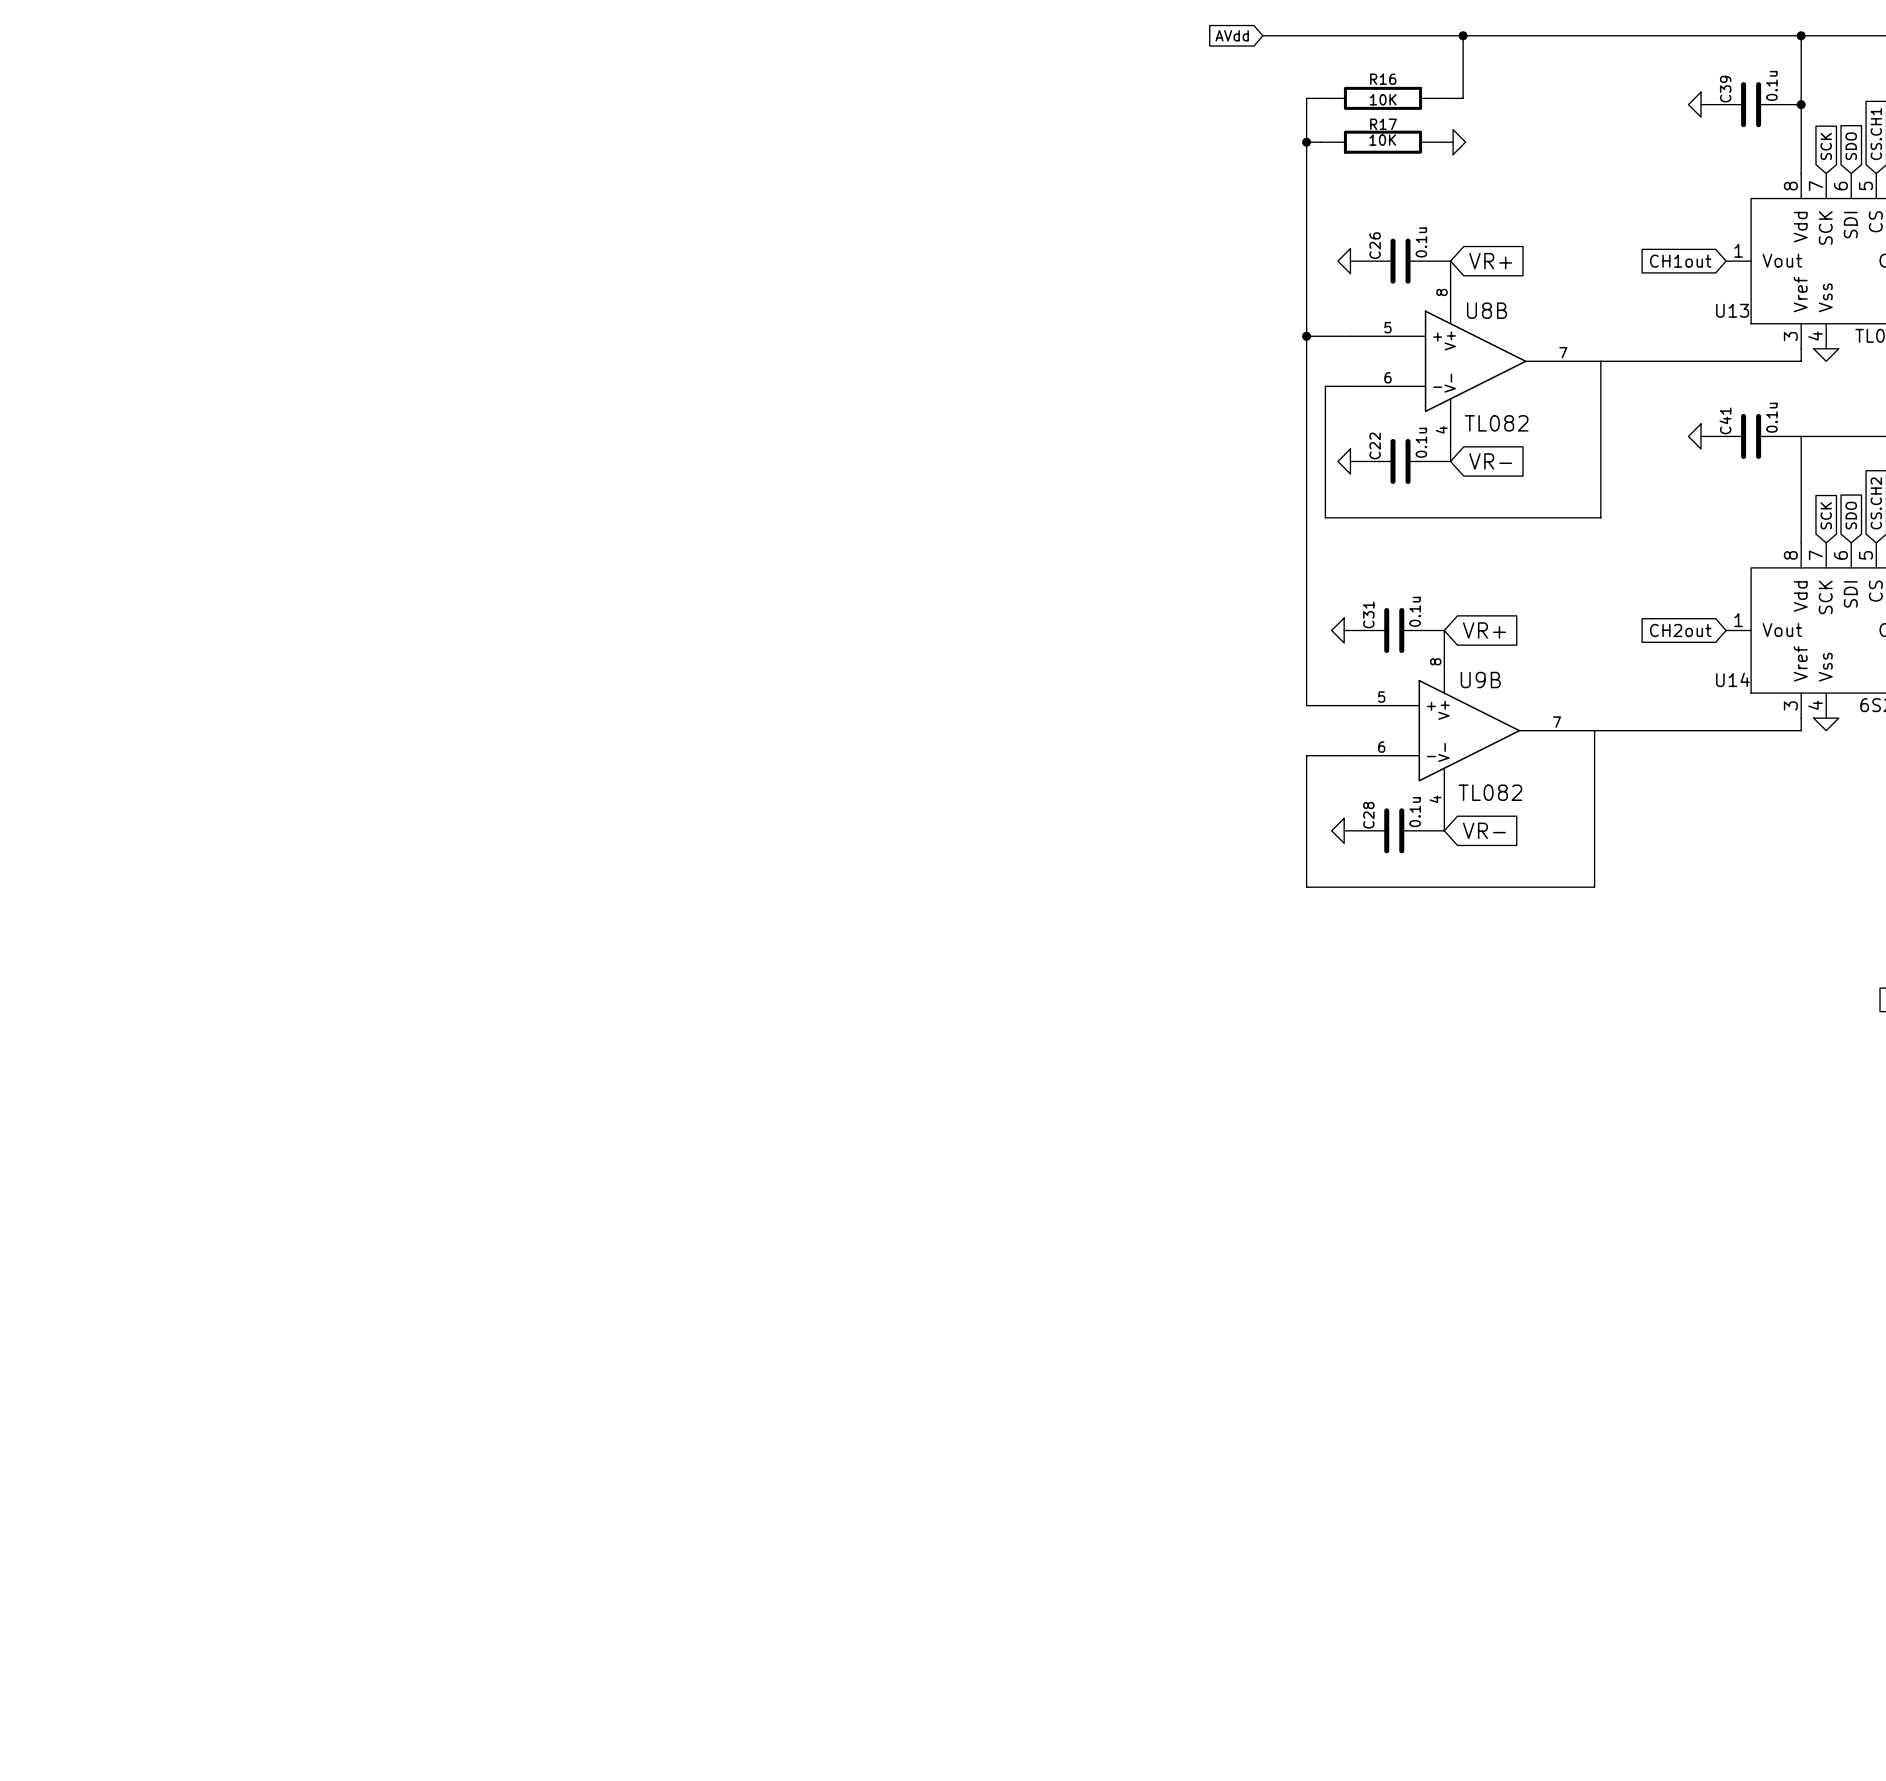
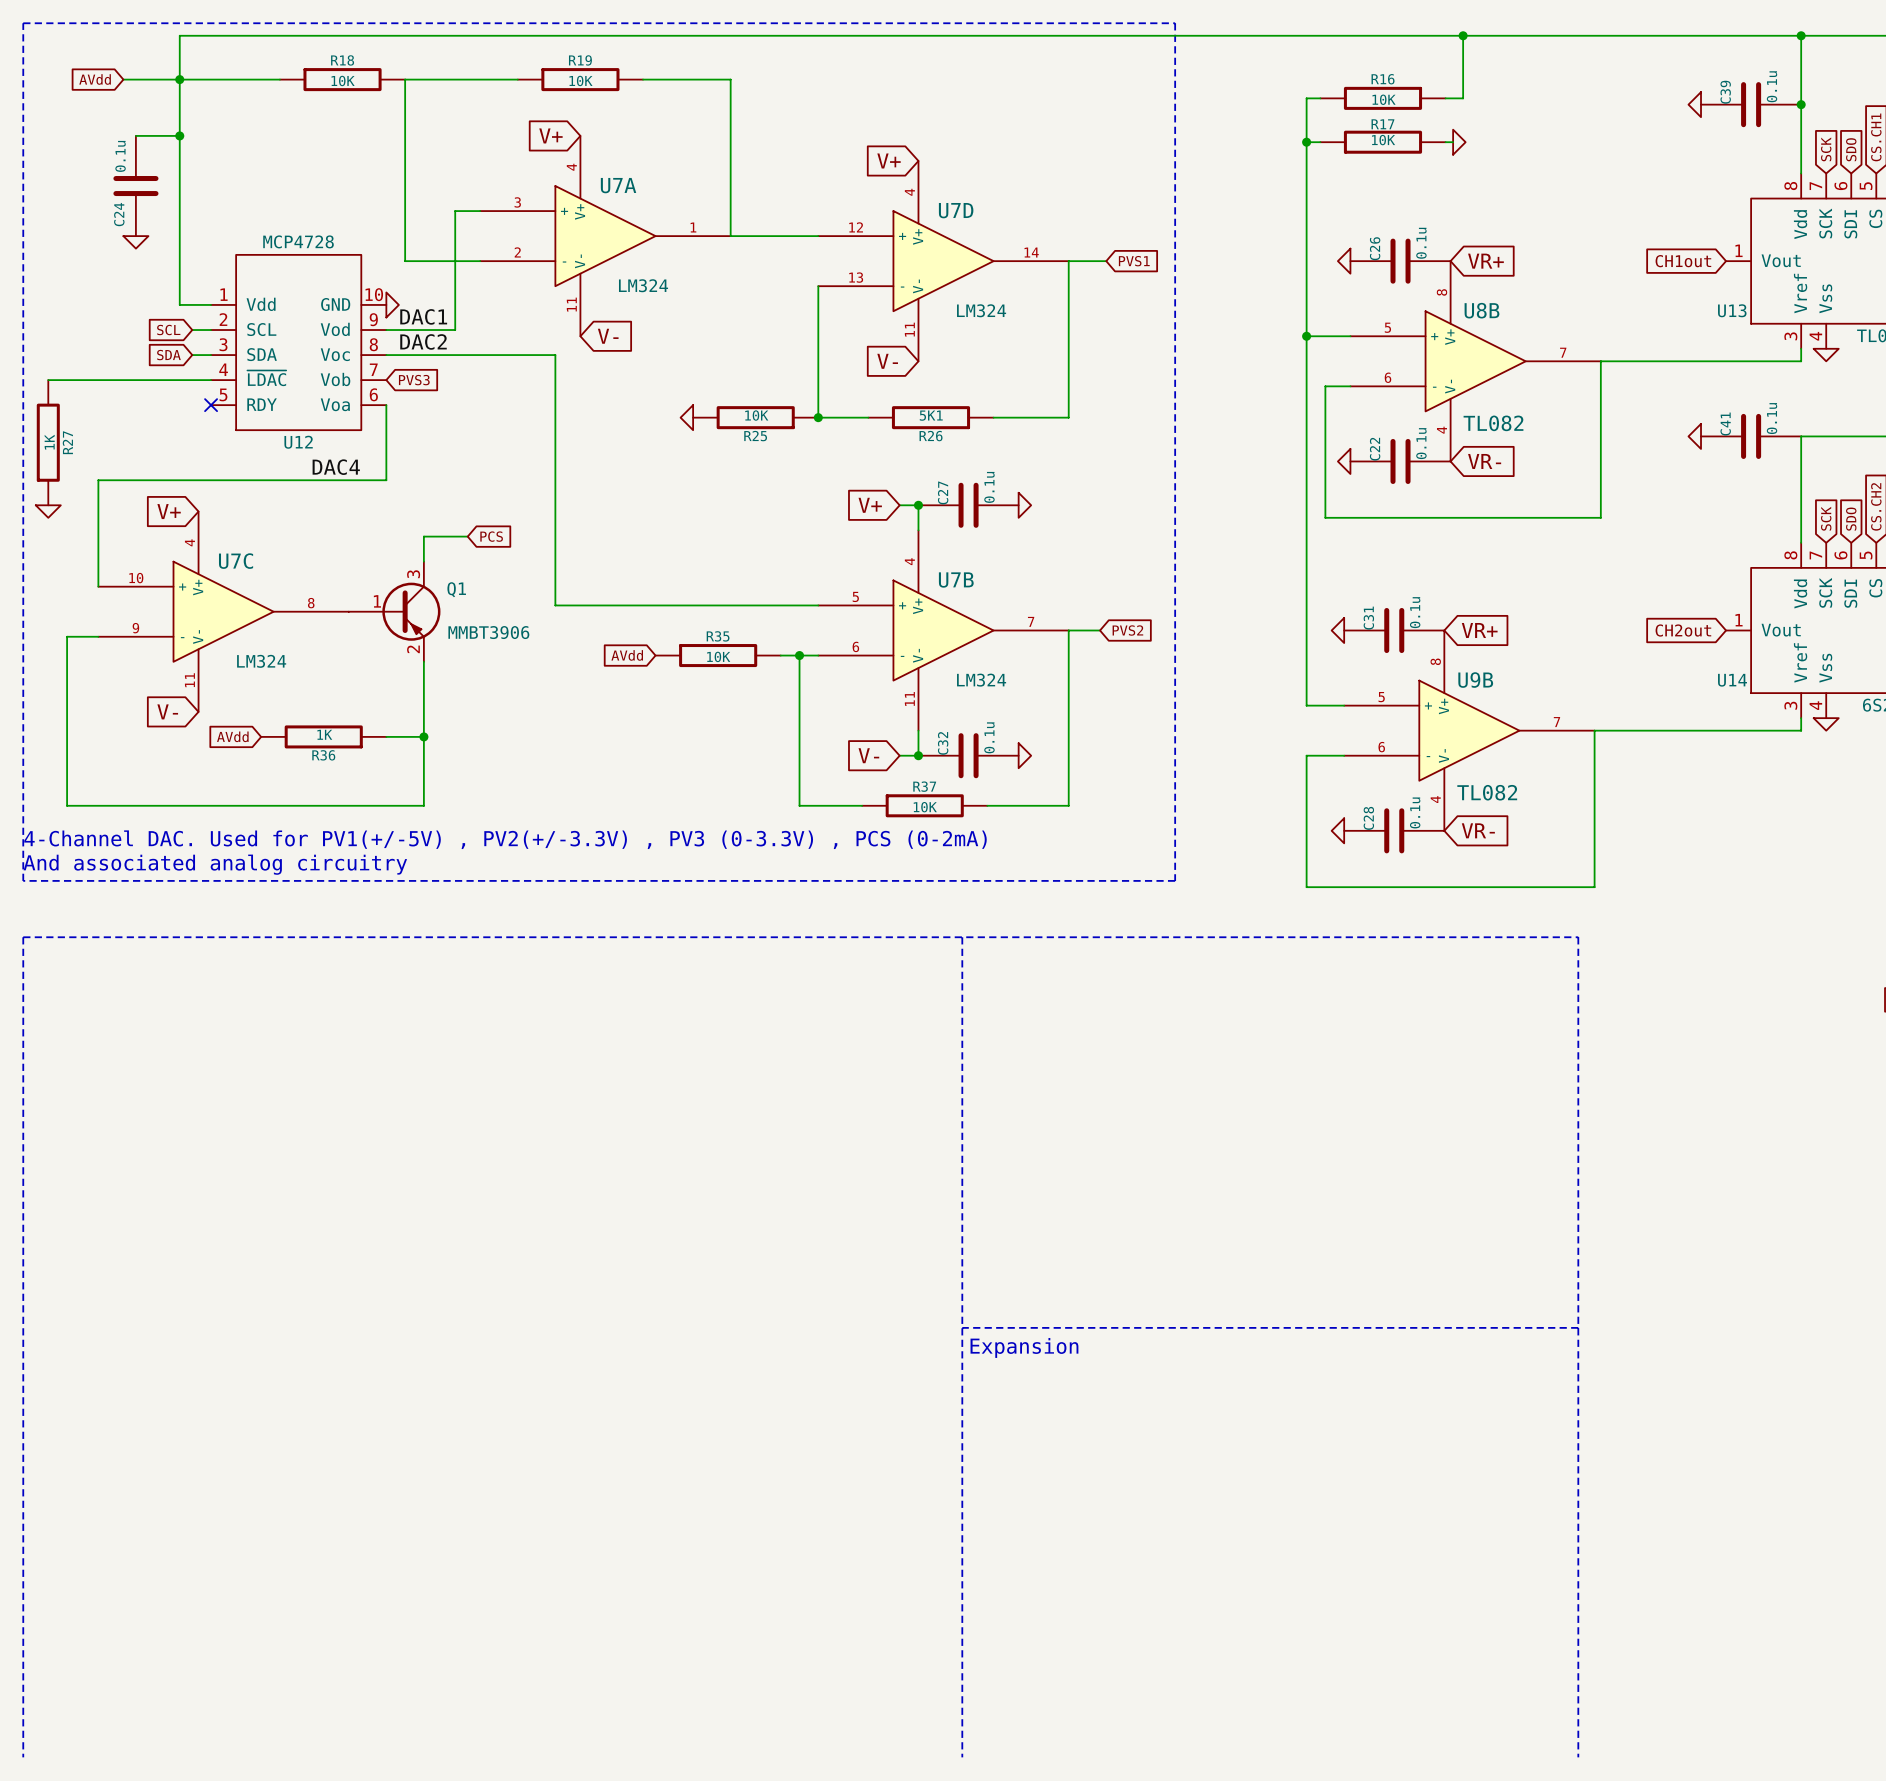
line: none -> (23, 23) (23, 880) (1175, 880) (1175, 23) (23, 23)
global label: AVdd (1232, 35) -> none
wire: none -> (1262, 35) (179, 35) (179, 304) (211, 304)
global label: none -> AVdd (95, 79)
wire: none -> (123, 79) (279, 79)
junction: none -> (179, 79)
R18: none -> 10K (342, 79)
wire: none -> (517, 79) (405, 79) (405, 261) (480, 261)
R19: none -> 10K (580, 79)
wire: none -> (643, 79) (730, 79) (730, 236) (818, 236)
wire: none -> (135, 135) (179, 135)
junction: none -> (179, 135)
global label: none -> V+ (550, 135)
global label: none -> V+ (889, 160)
C24: none -> 0.1u (135, 186)
wire: none -> (480, 211) (455, 211) (455, 330) (386, 330)
U7A: none -> LM324 (605, 236)
power symbol: none -> (135, 242)
U7D: none -> LM324 (943, 261)
wire: none -> (1106, 261) (1068, 261) (1068, 417) (993, 417)
global label: none -> PVS1 (1134, 261)
wire: none -> (818, 286) (818, 417) (868, 417)
power symbol: none -> (392, 304)
label: none -> DAC1 (423, 316)
global label: none -> SCL (168, 330)
wire: none -> (192, 330) (211, 330)
global label: none -> V- (608, 336)
label: none -> DAC2 (423, 341)
U12: none -> MCP4728 (298, 342)
global label: none -> SDA (168, 355)
wire: none -> (192, 355) (211, 355)
wire: none -> (386, 355) (555, 355) (555, 605) (818, 605)
global label: none -> V- (887, 361)
wire: none -> (48, 380) (211, 380)
global label: none -> PVS3 (414, 380)
no-connect mark: none -> (211, 405)
wire: none -> (386, 405) (386, 480) (98, 480) (98, 586)
power symbol: none -> (686, 417)
R25: none -> 10K (755, 417)
junction: none -> (818, 417)
R26: none -> 5K1 (930, 417)
R27: none -> 1K (48, 442)
label: none -> DAC4 (336, 467)
global label: none -> V+ (870, 505)
wire: none -> (899, 505) (918, 505) (918, 530)
junction: none -> (918, 505)
C27: none -> 0.1u (968, 505)
power symbol: none -> (1024, 505)
power symbol: none -> (48, 511)
global label: none -> V+ (169, 511)
wire: none -> (467, 536) (423, 536) (423, 561)
global label: none -> PCS (491, 536)
U7C: none -> LM324 (223, 611)
Q1: none -> MMBT3906 (394, 611)
U7B: none -> LM324 (943, 630)
wire: none -> (1100, 630) (1068, 630) (1068, 805) (987, 805)
global label: none -> PVS2 (1127, 630)
wire: none -> (98, 636) (67, 636) (67, 805) (423, 805) (423, 661)
global label: none -> AVdd (627, 655)
R35: none -> 10K (718, 655)
wire: none -> (780, 655) (818, 655)
wire: none -> (799, 655) (799, 805) (862, 805)
junction: none -> (799, 655)
global label: none -> V- (167, 711)
wire: none -> (918, 730) (918, 755) (899, 755)
global label: none -> AVdd (232, 736)
R36: none -> 1K (323, 736)
wire: none -> (386, 736) (423, 736)
junction: none -> (423, 736)
global label: none -> V- (868, 755)
junction: none -> (918, 755)
C32: none -> 0.1u (968, 755)
power symbol: none -> (1024, 755)
R37: none -> 10K (924, 805)
text: none -> 4-Channel DAC. Used for PV1(+/-5V) , PV2(+/-3.3V) , PV3 (0-3.3V) , PCS (0-2mA) (505, 839)
text: none -> And associated analog circuitry (215, 864)
line: none -> (962, 937) (962, 1757)
line: none -> (962, 1327) (1578, 1327)
text: none -> Expansion (1024, 1347)
line: none -> (23, 1757) (23, 937) (1578, 937) (1578, 1757)

